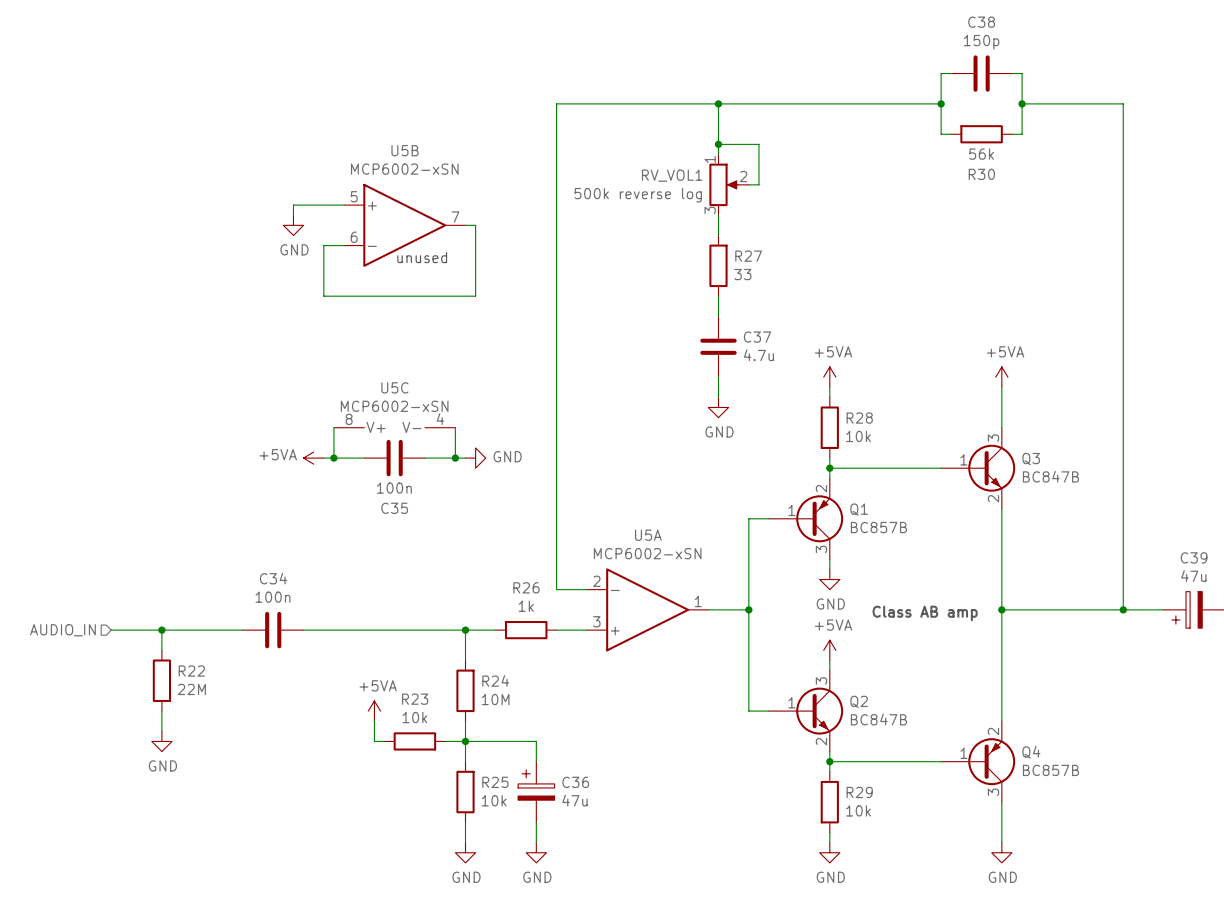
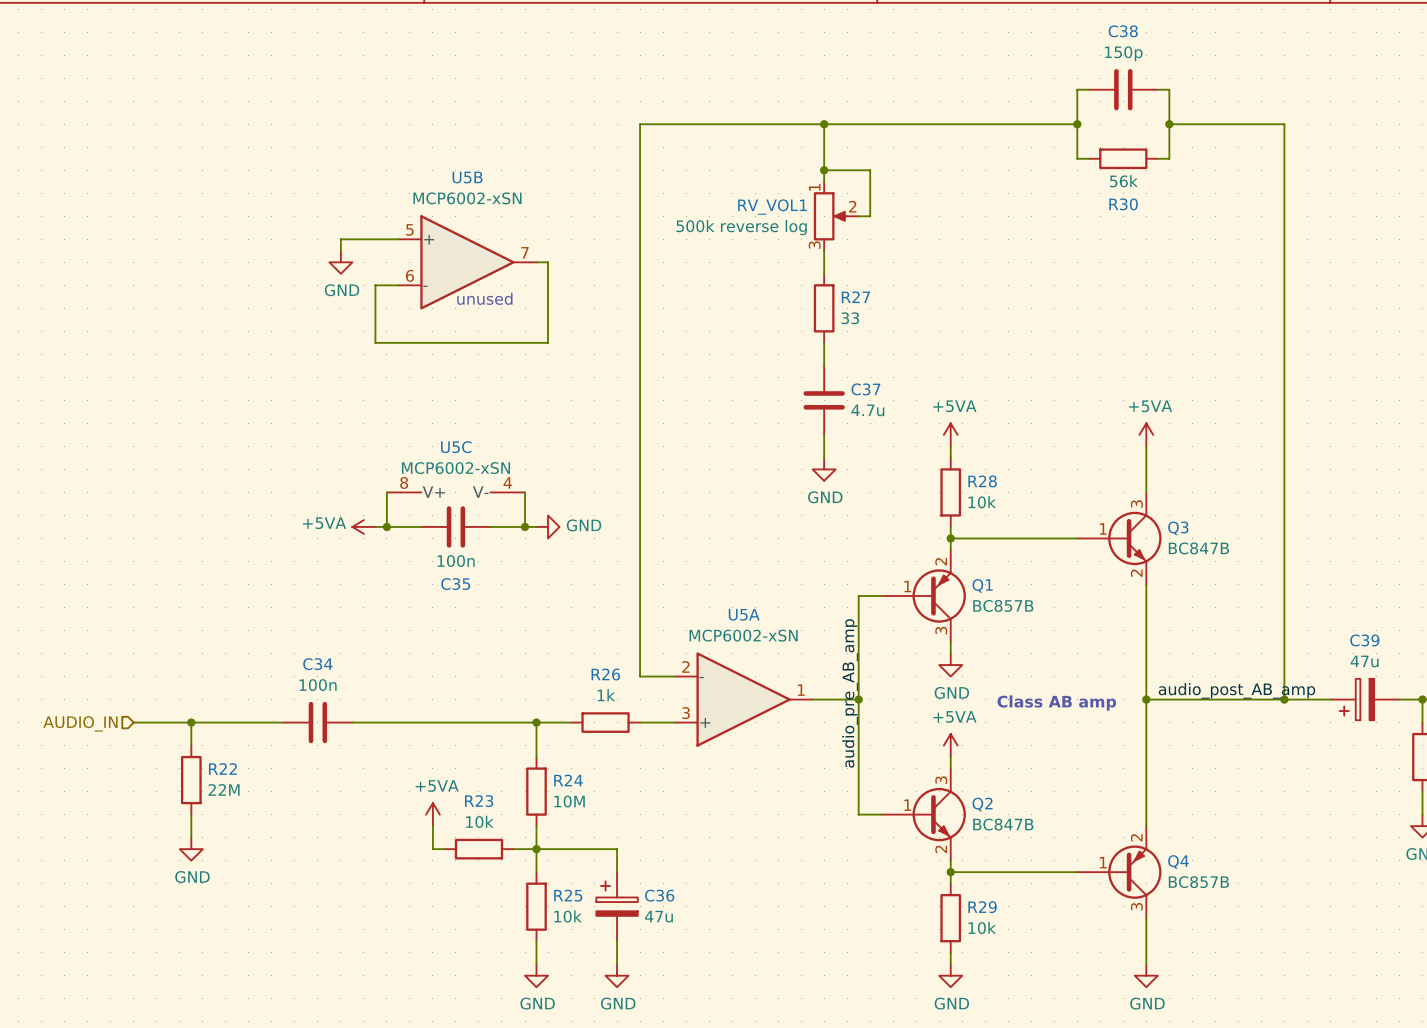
label: none -> audio_pre_AB_amp (850, 693)
label: none -> audio_post_AB_amp (1236, 690)

